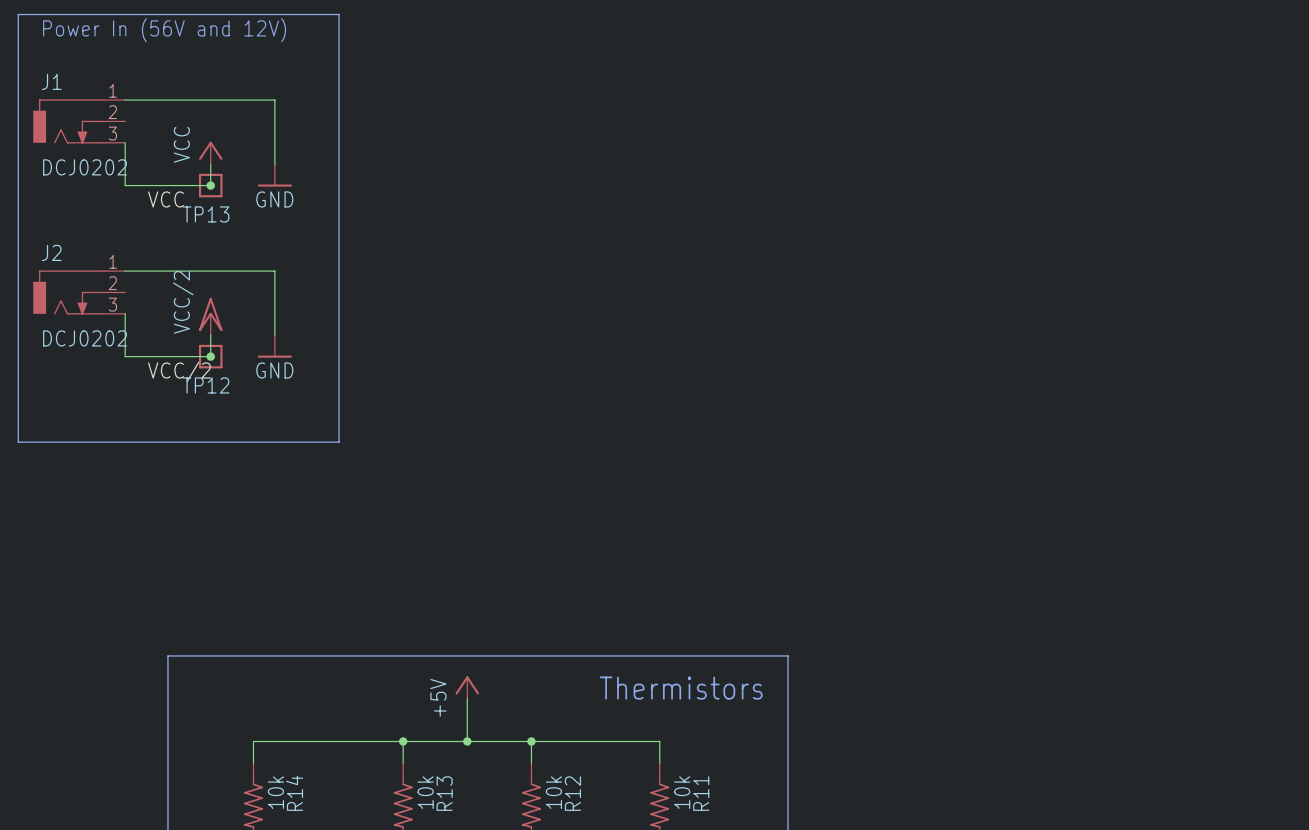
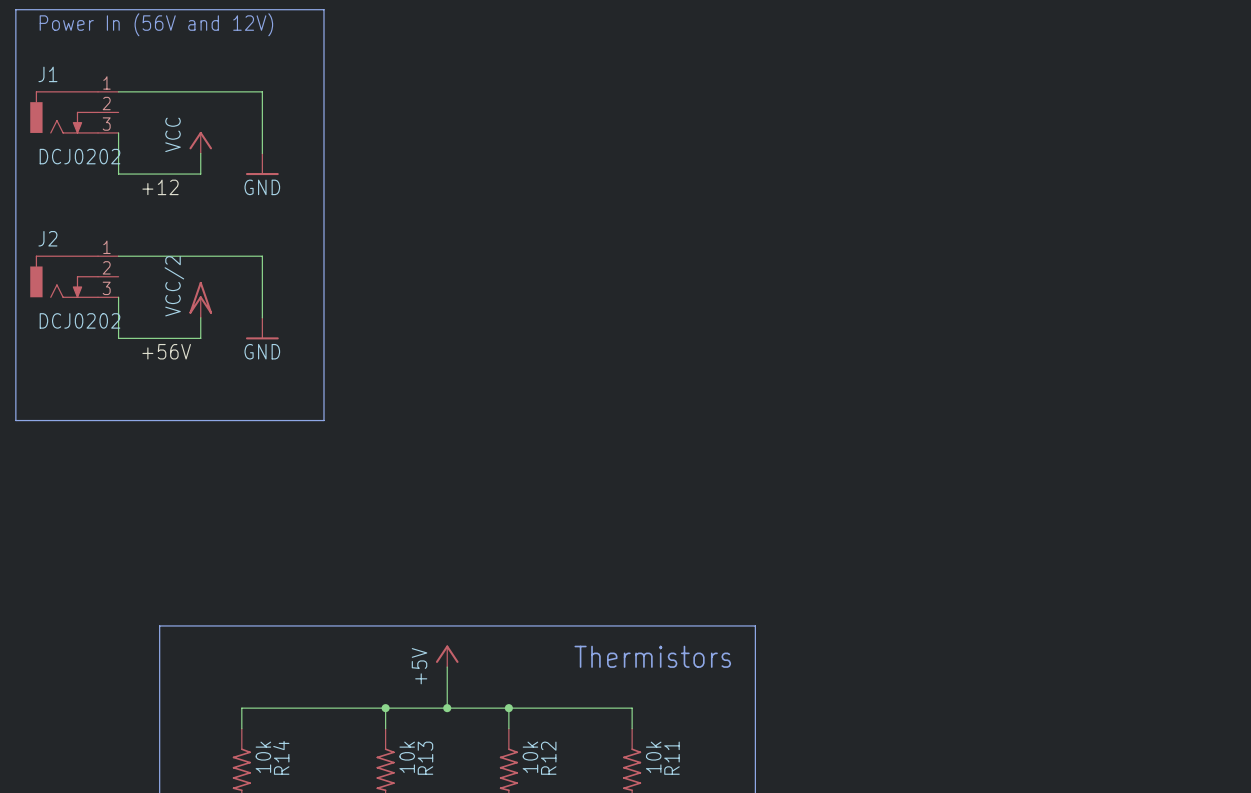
TP13: (210, 185) -> none
junction: (210, 185) -> none
label: VCC (165, 199) -> +12 (160, 187)
TP12: (210, 356) -> none
junction: (210, 356) -> none
label: VCC/2 (179, 371) -> +56V (166, 351)

